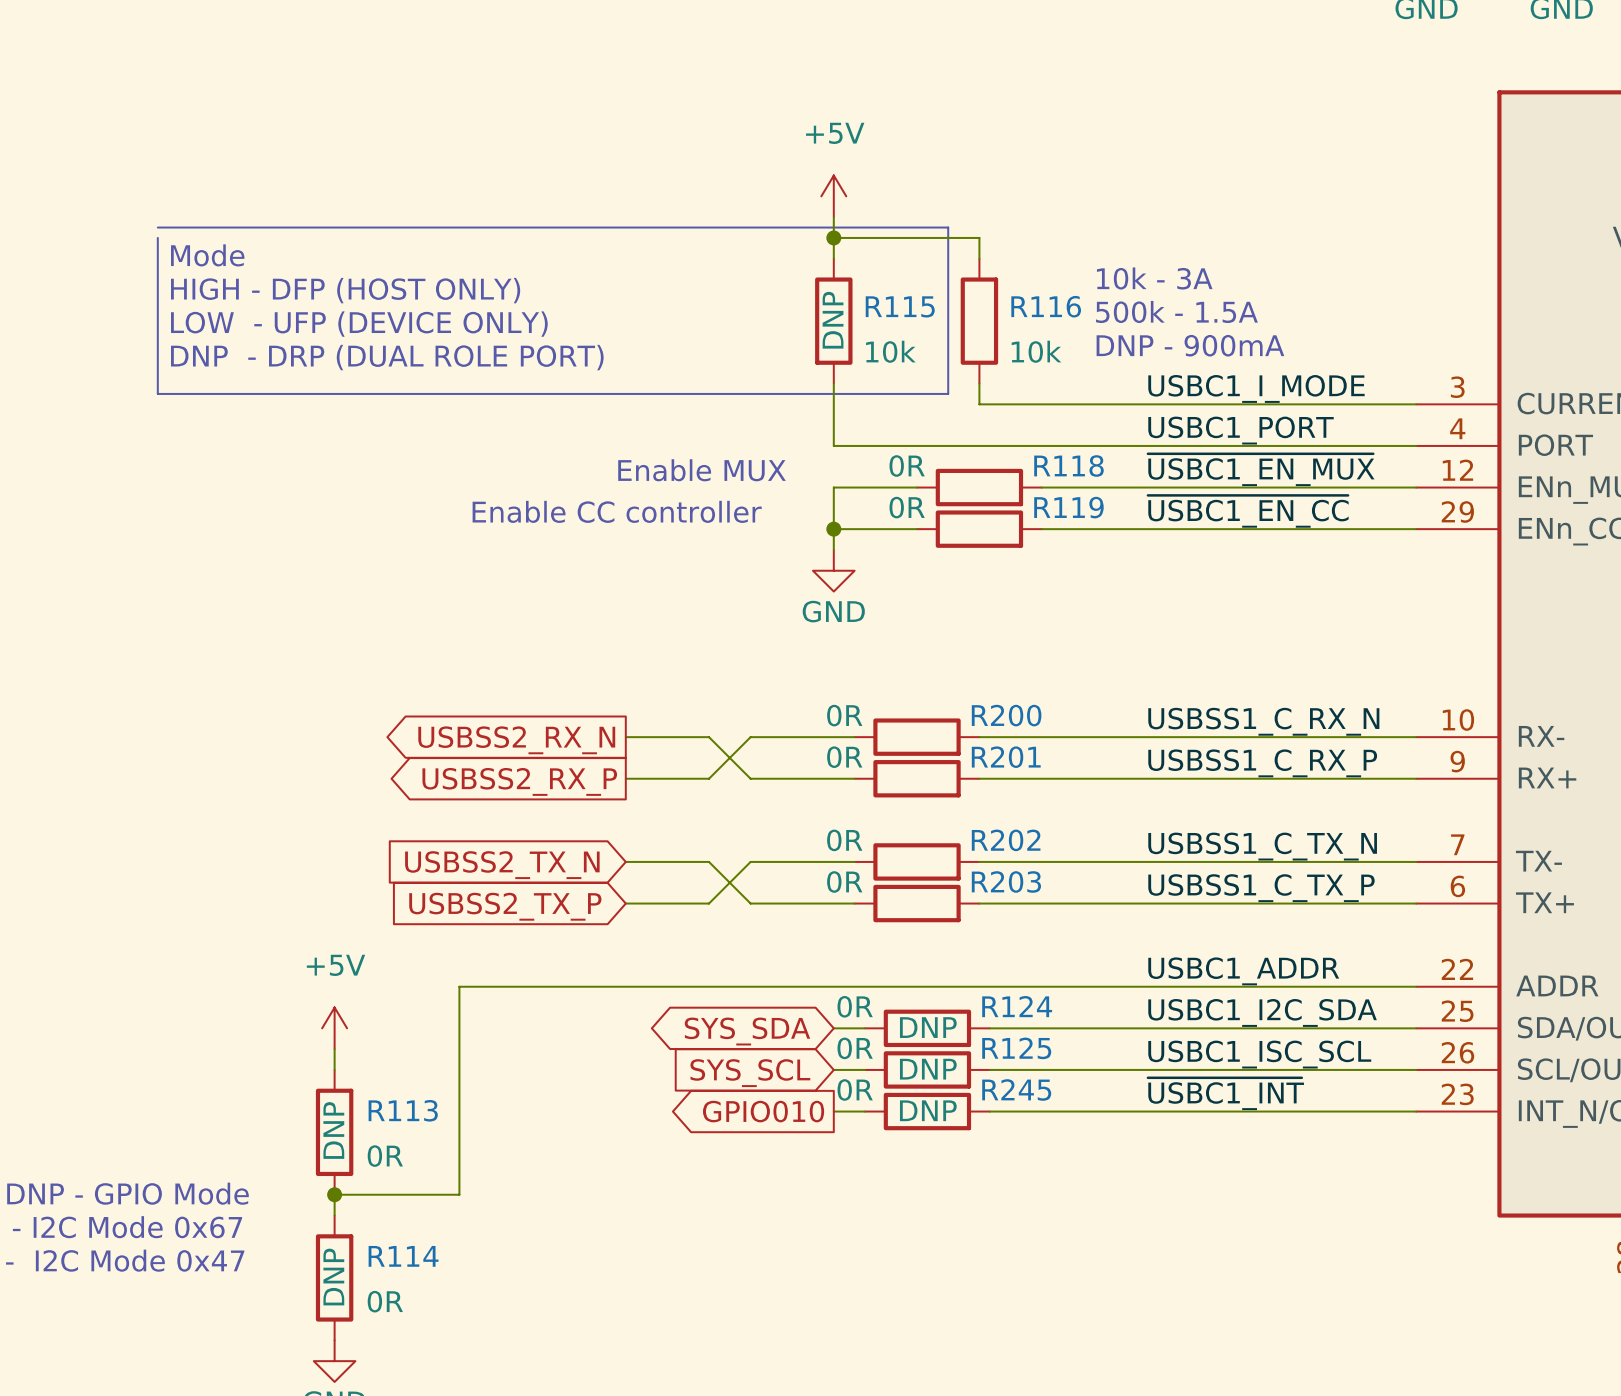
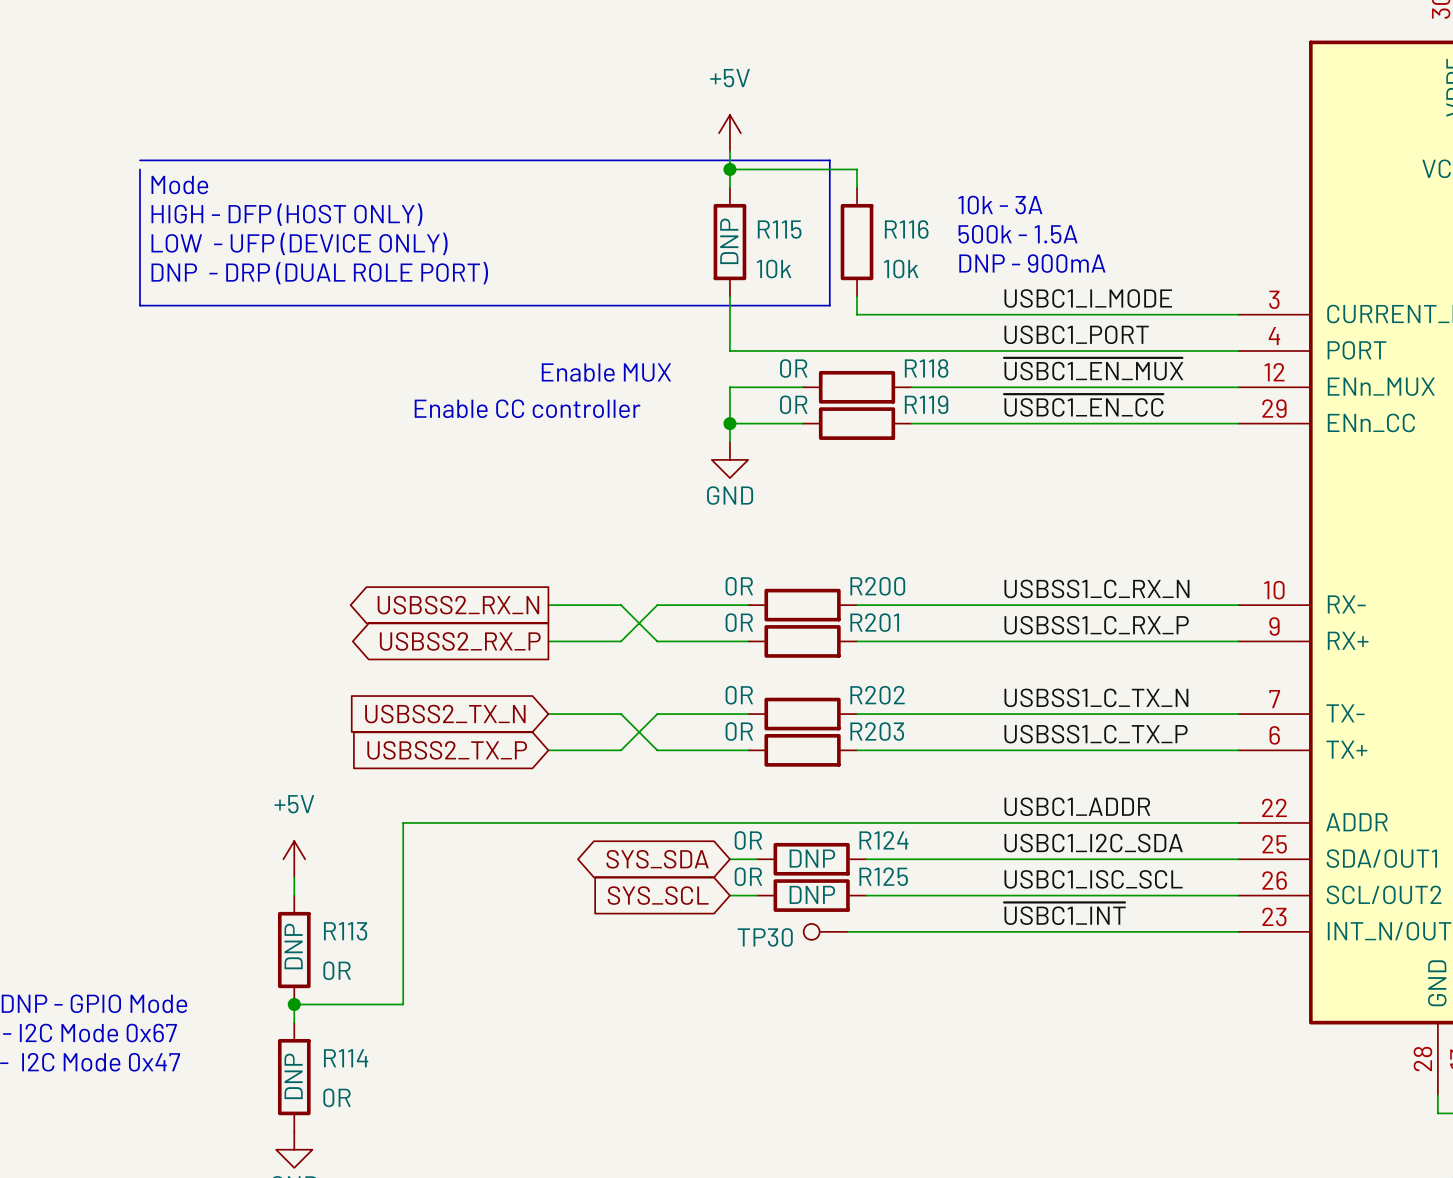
global label: GPIO010 (763, 1111) -> none
wire: (833, 1111) (865, 1111) -> none
R245: (927, 1111) -> none
TP30: none -> (825, 931)

